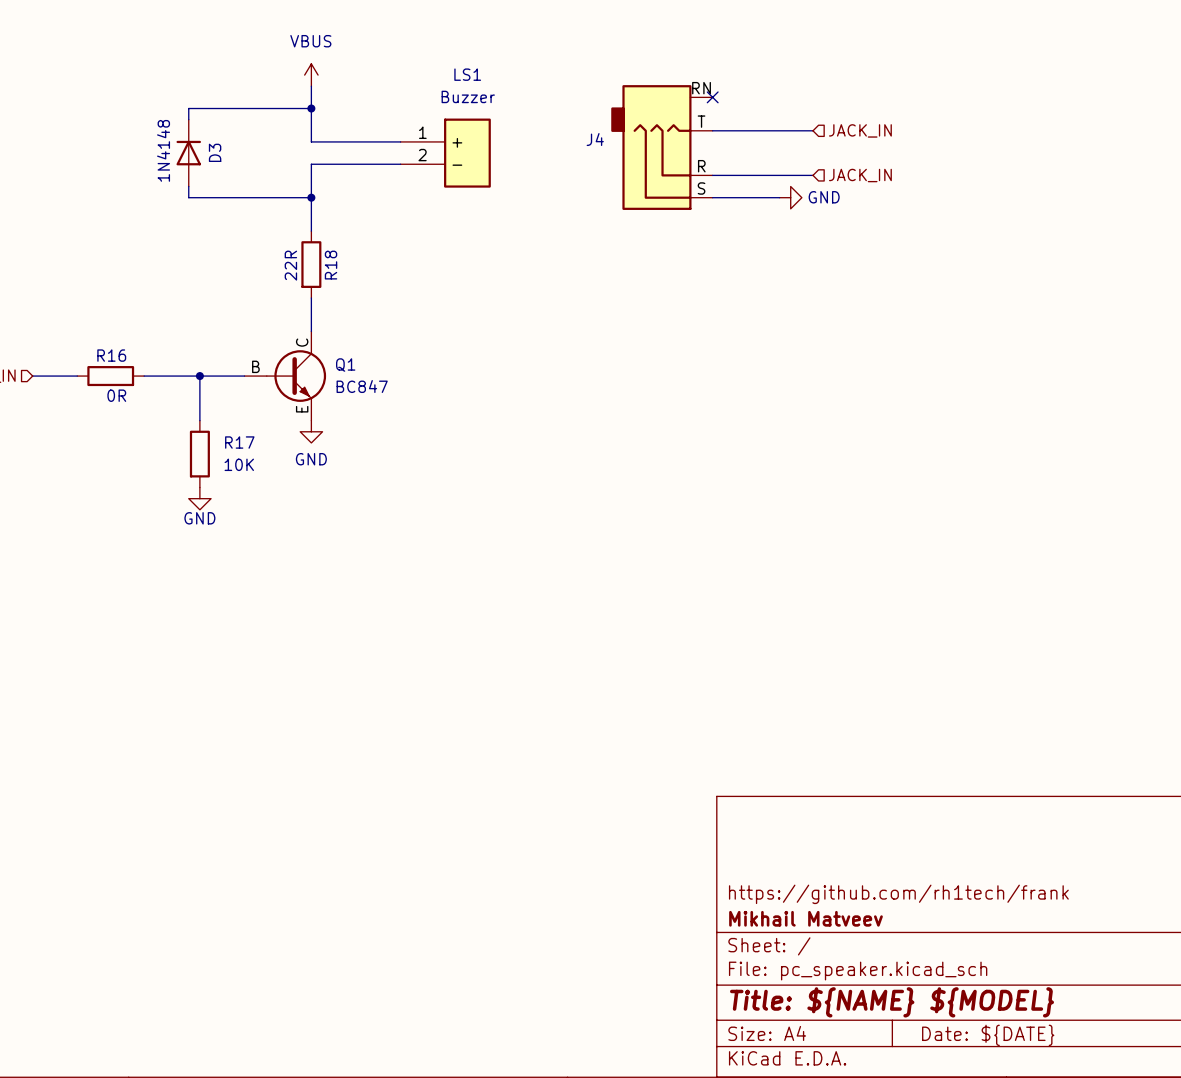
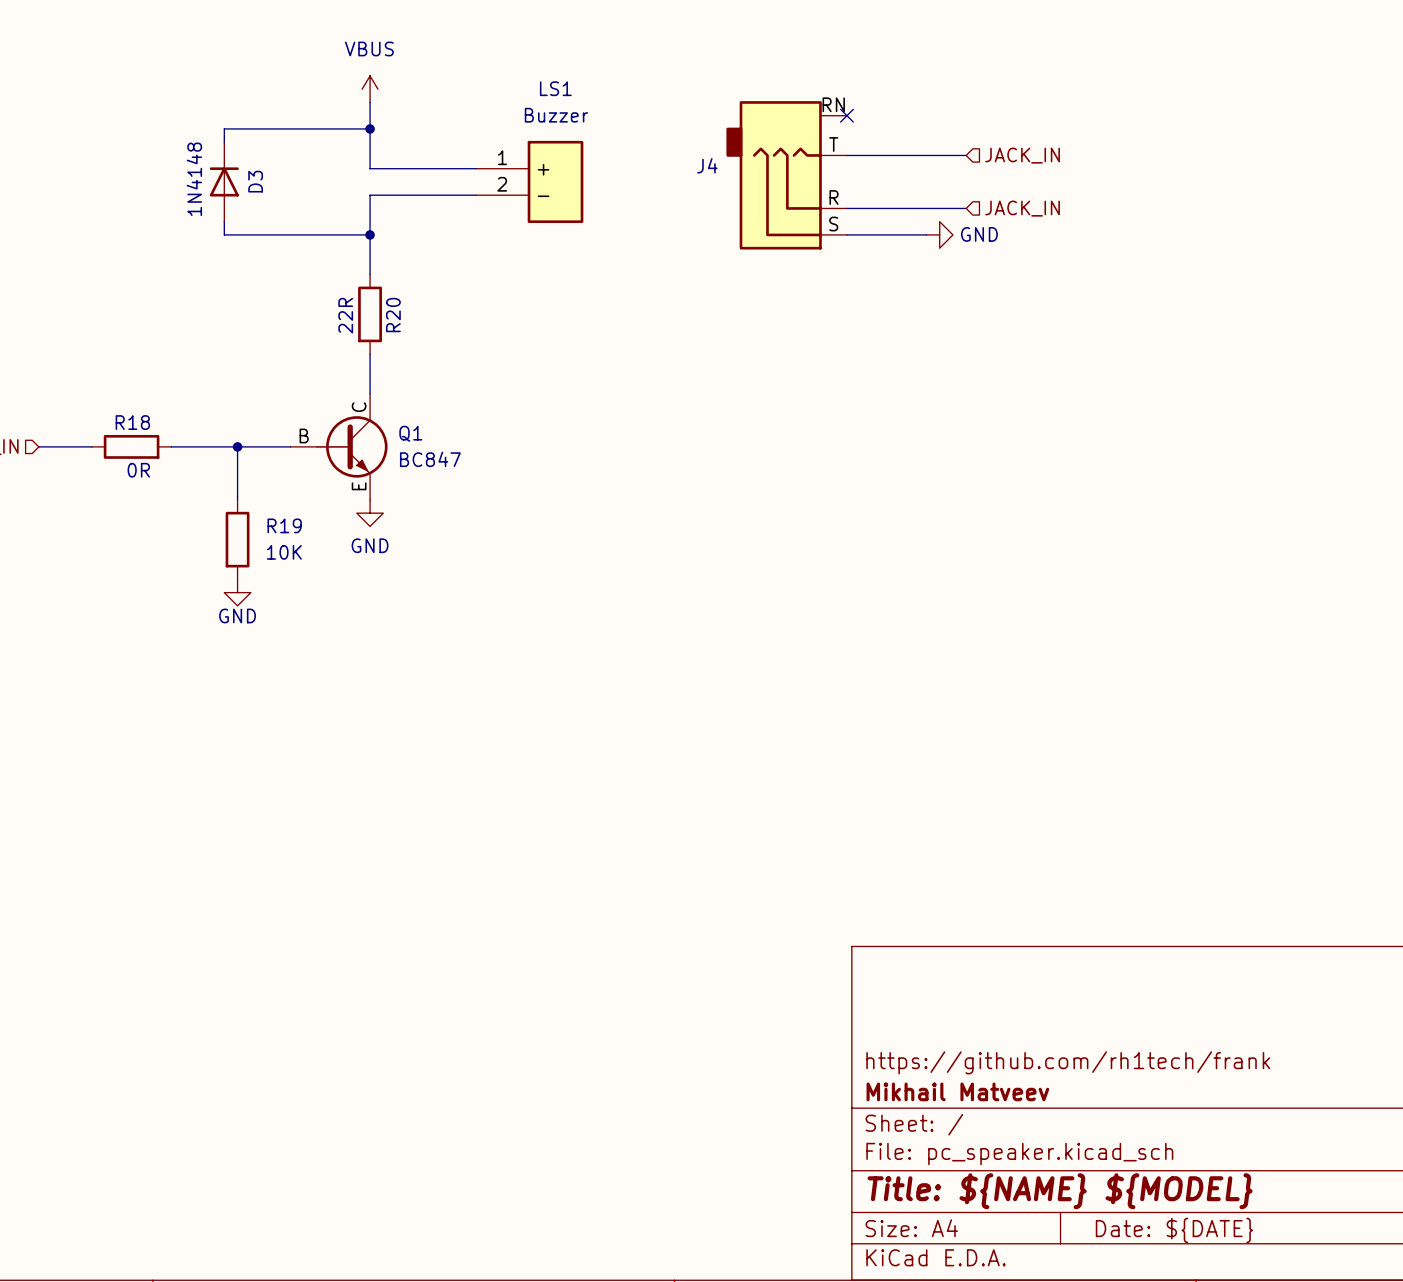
R18 name: R18 (331, 265) -> R20 (393, 315)
R16 name: R16 (111, 355) -> R18 (132, 422)
R17 name: R17 (239, 442) -> R19 (284, 525)

